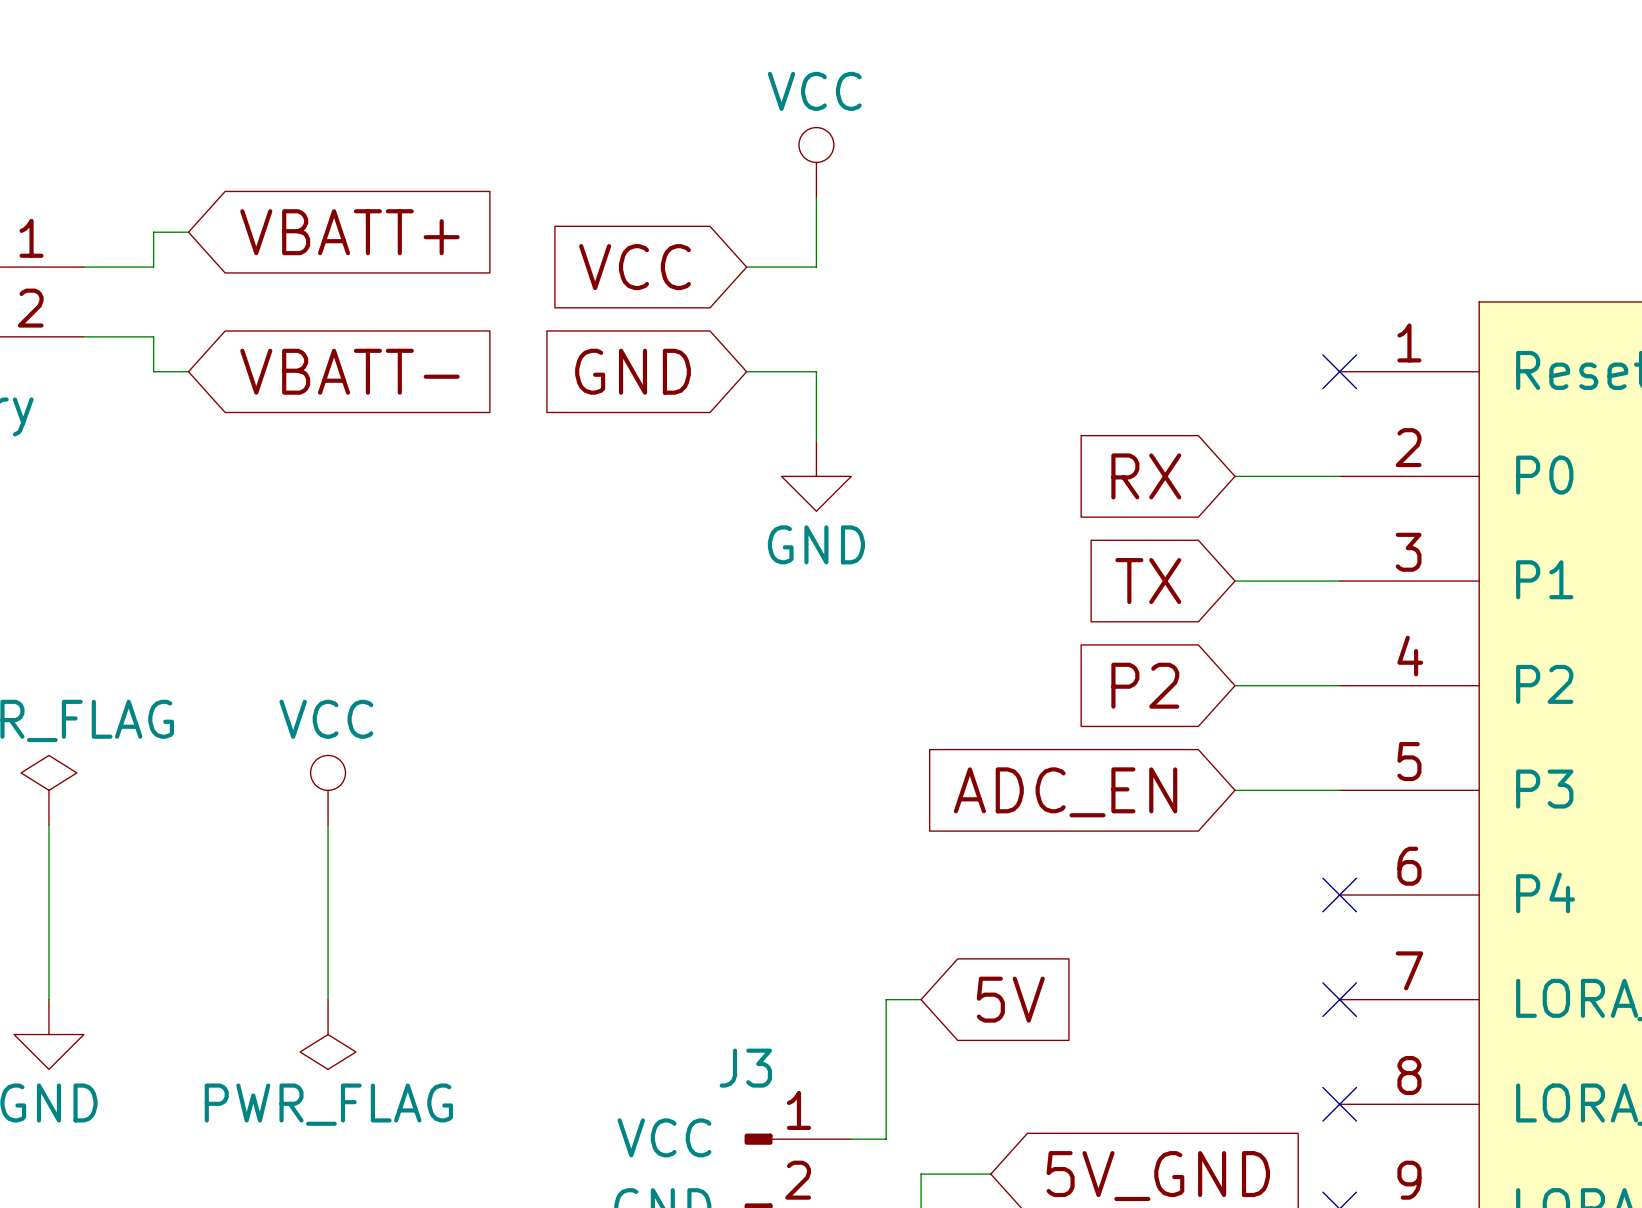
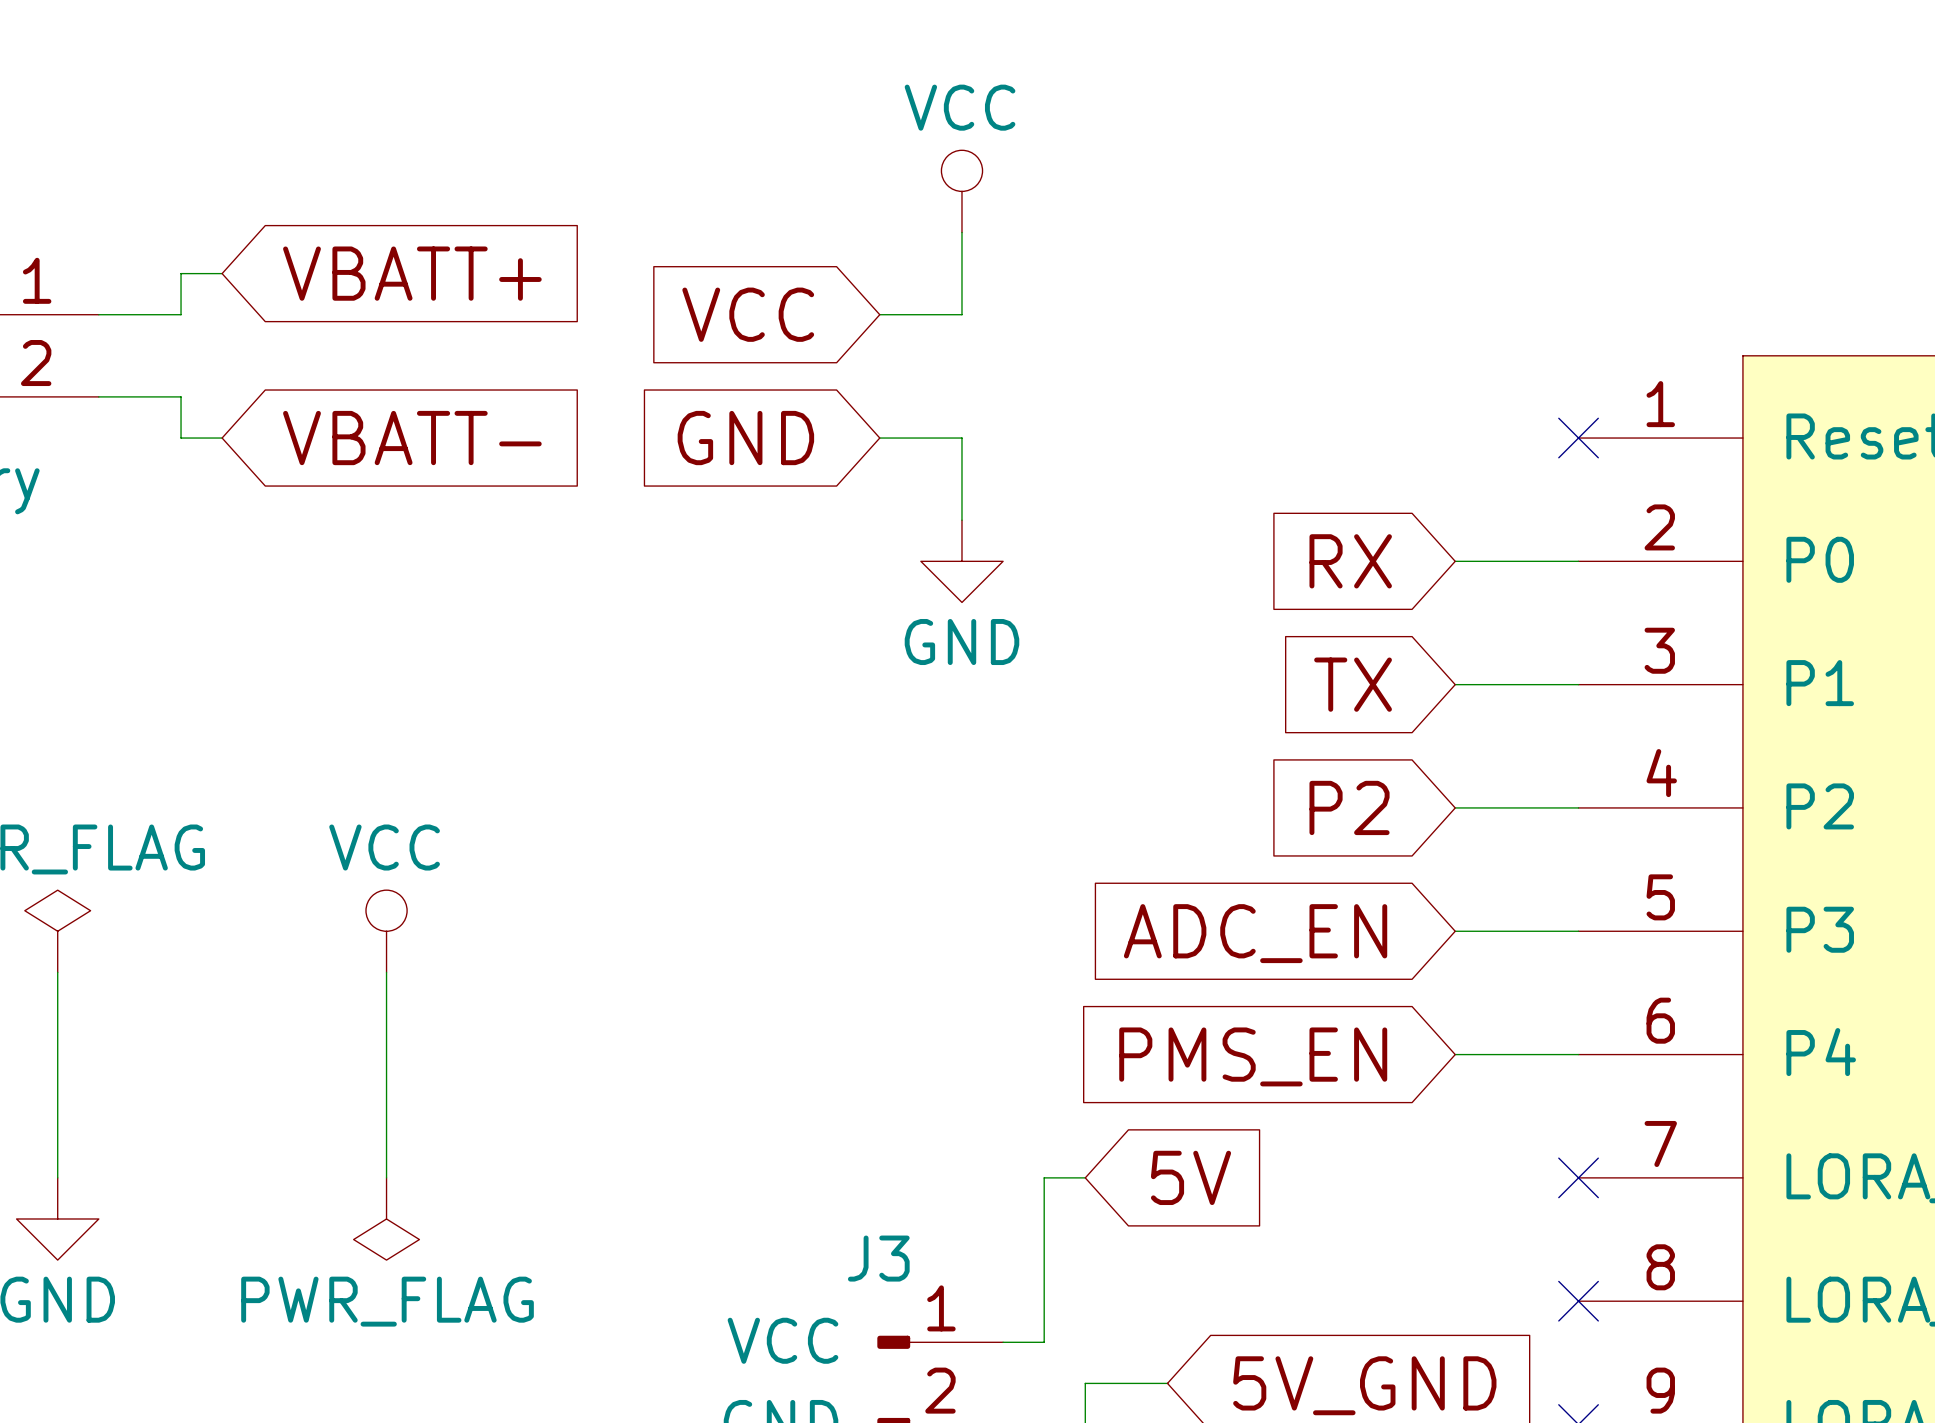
wire: none -> (1455, 1054) (1578, 1054)
no-connect mark: (1339, 895) -> none
global label: none -> PMS_EN (1253, 1056)

